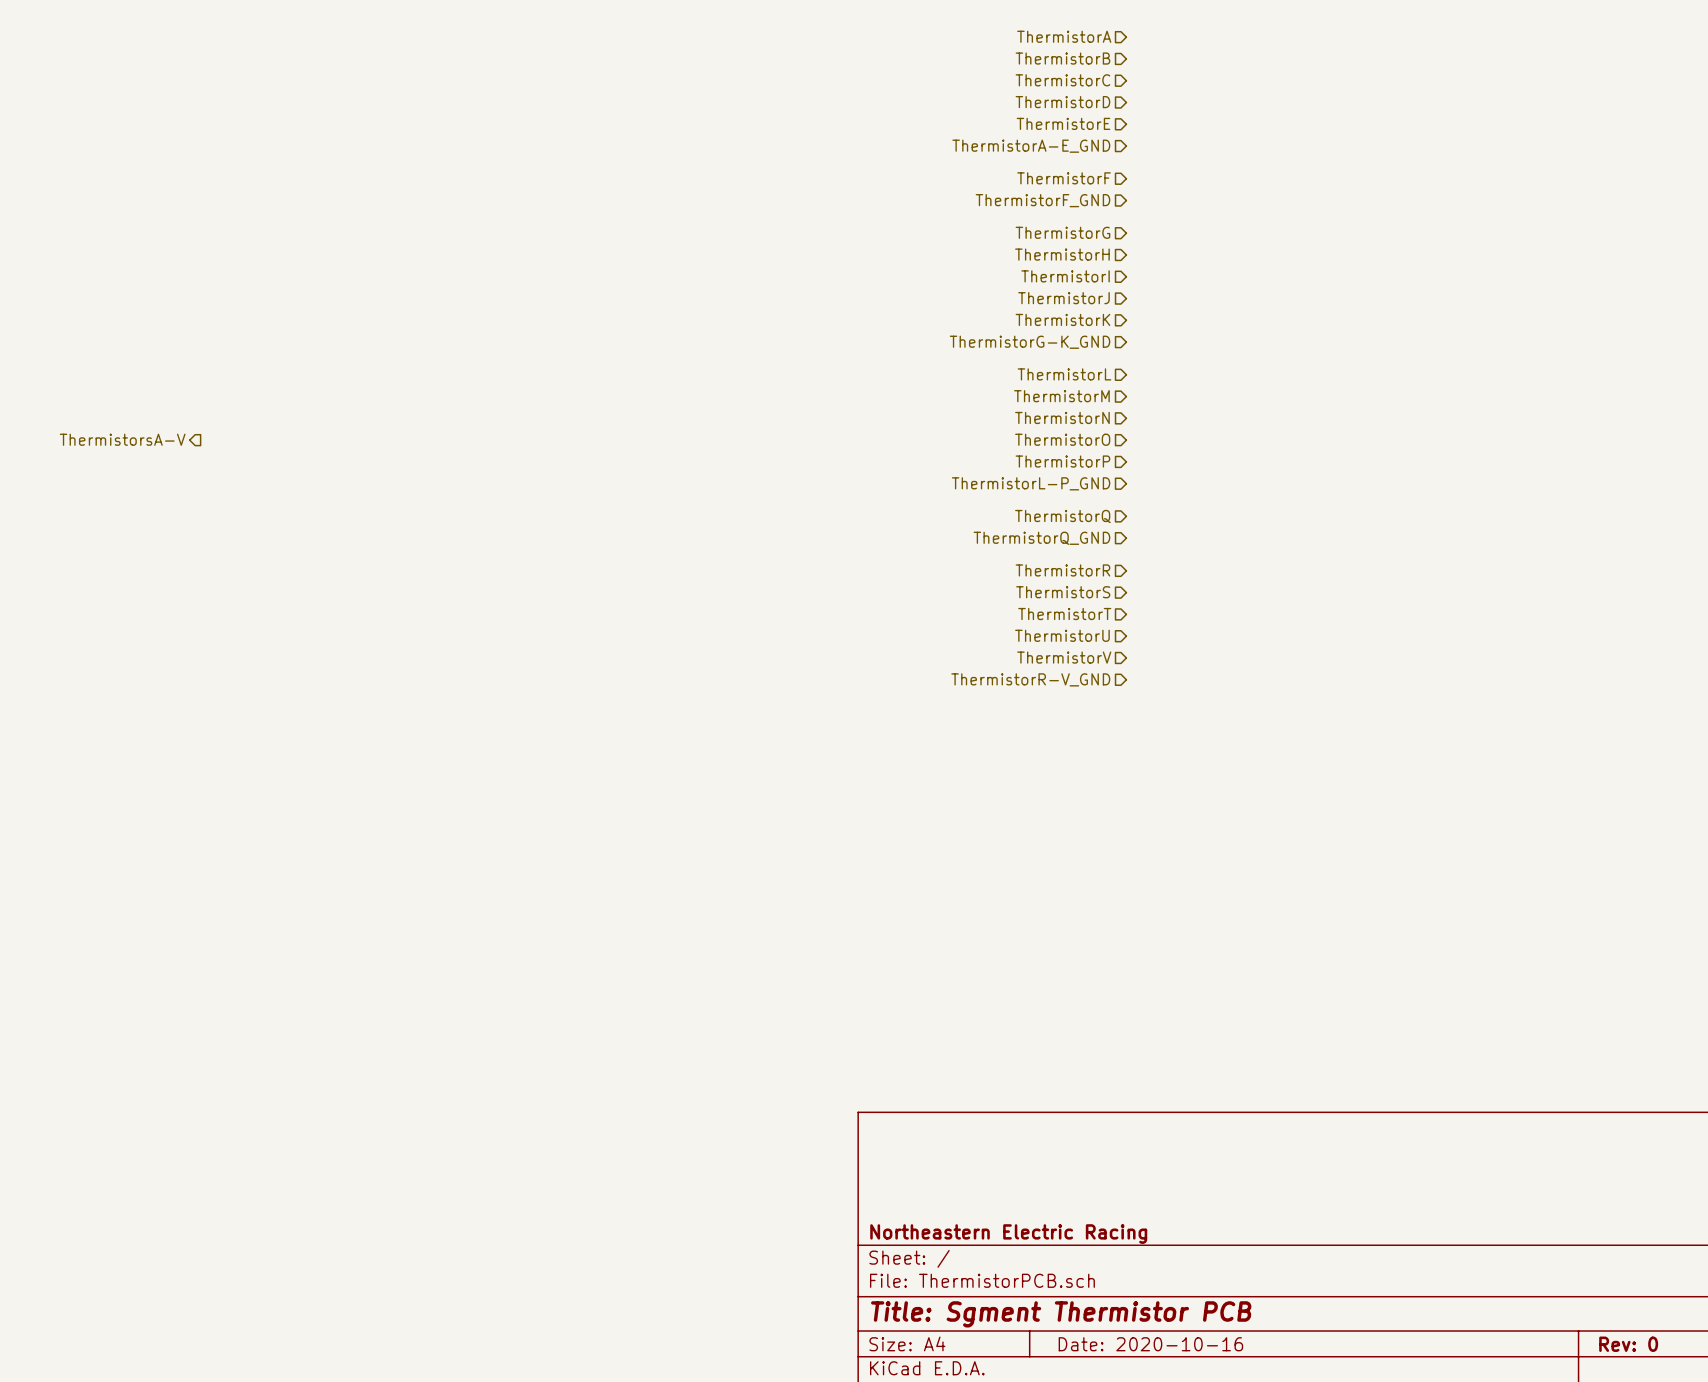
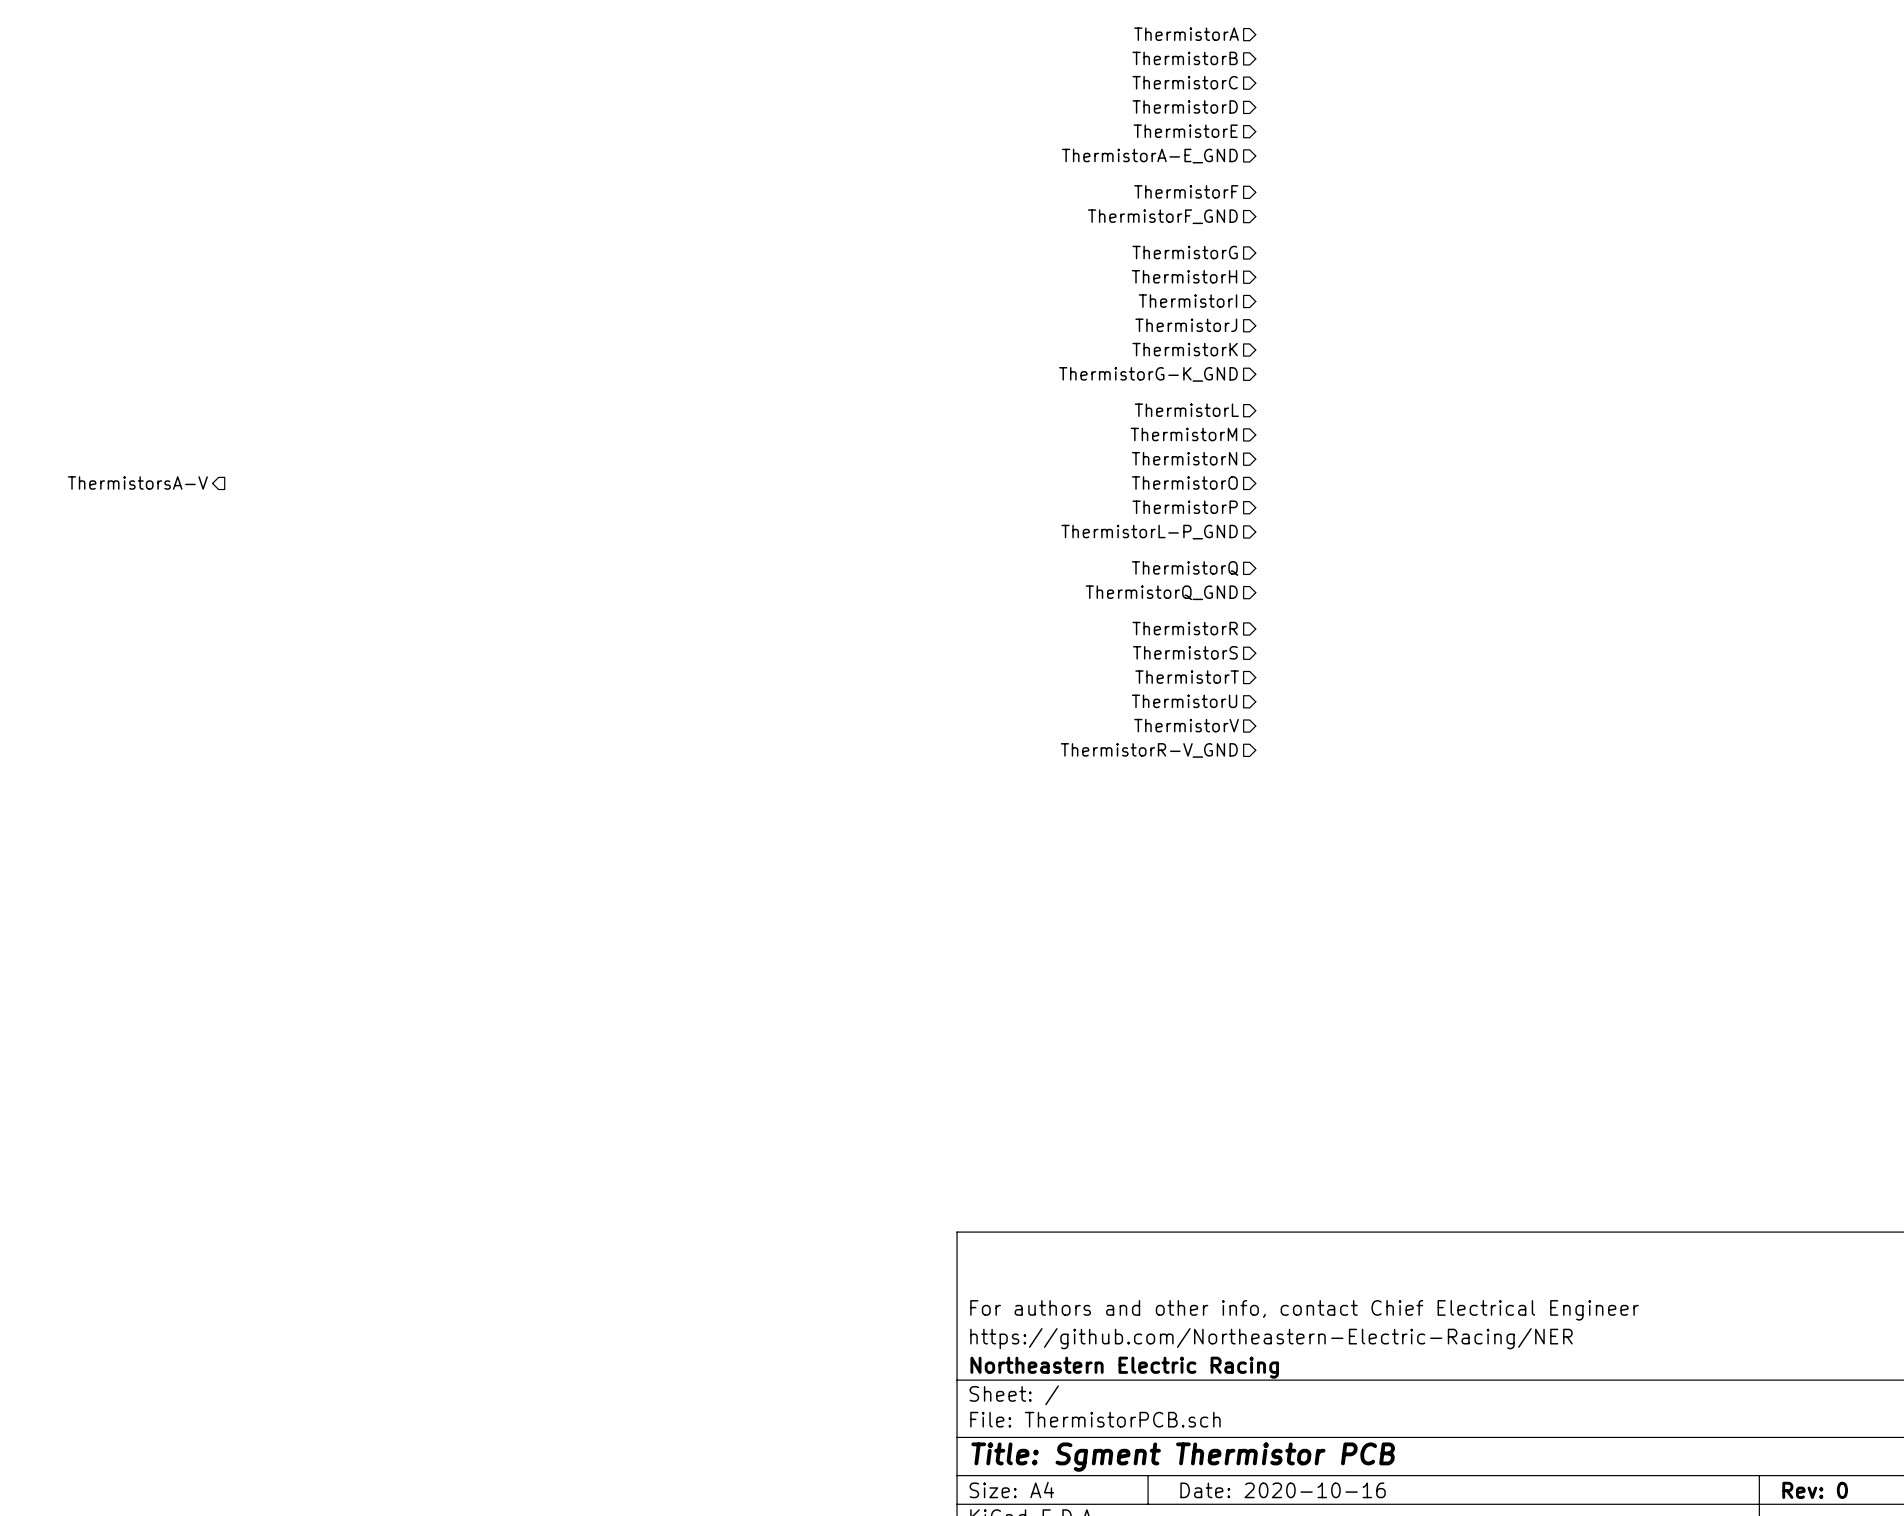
title block: none -> For authors and other info, contact Chief Electrical Engineer (1304, 1310)
title block: none -> https://github.com/Northeastern-Electric-Racing/NER (1271, 1338)

